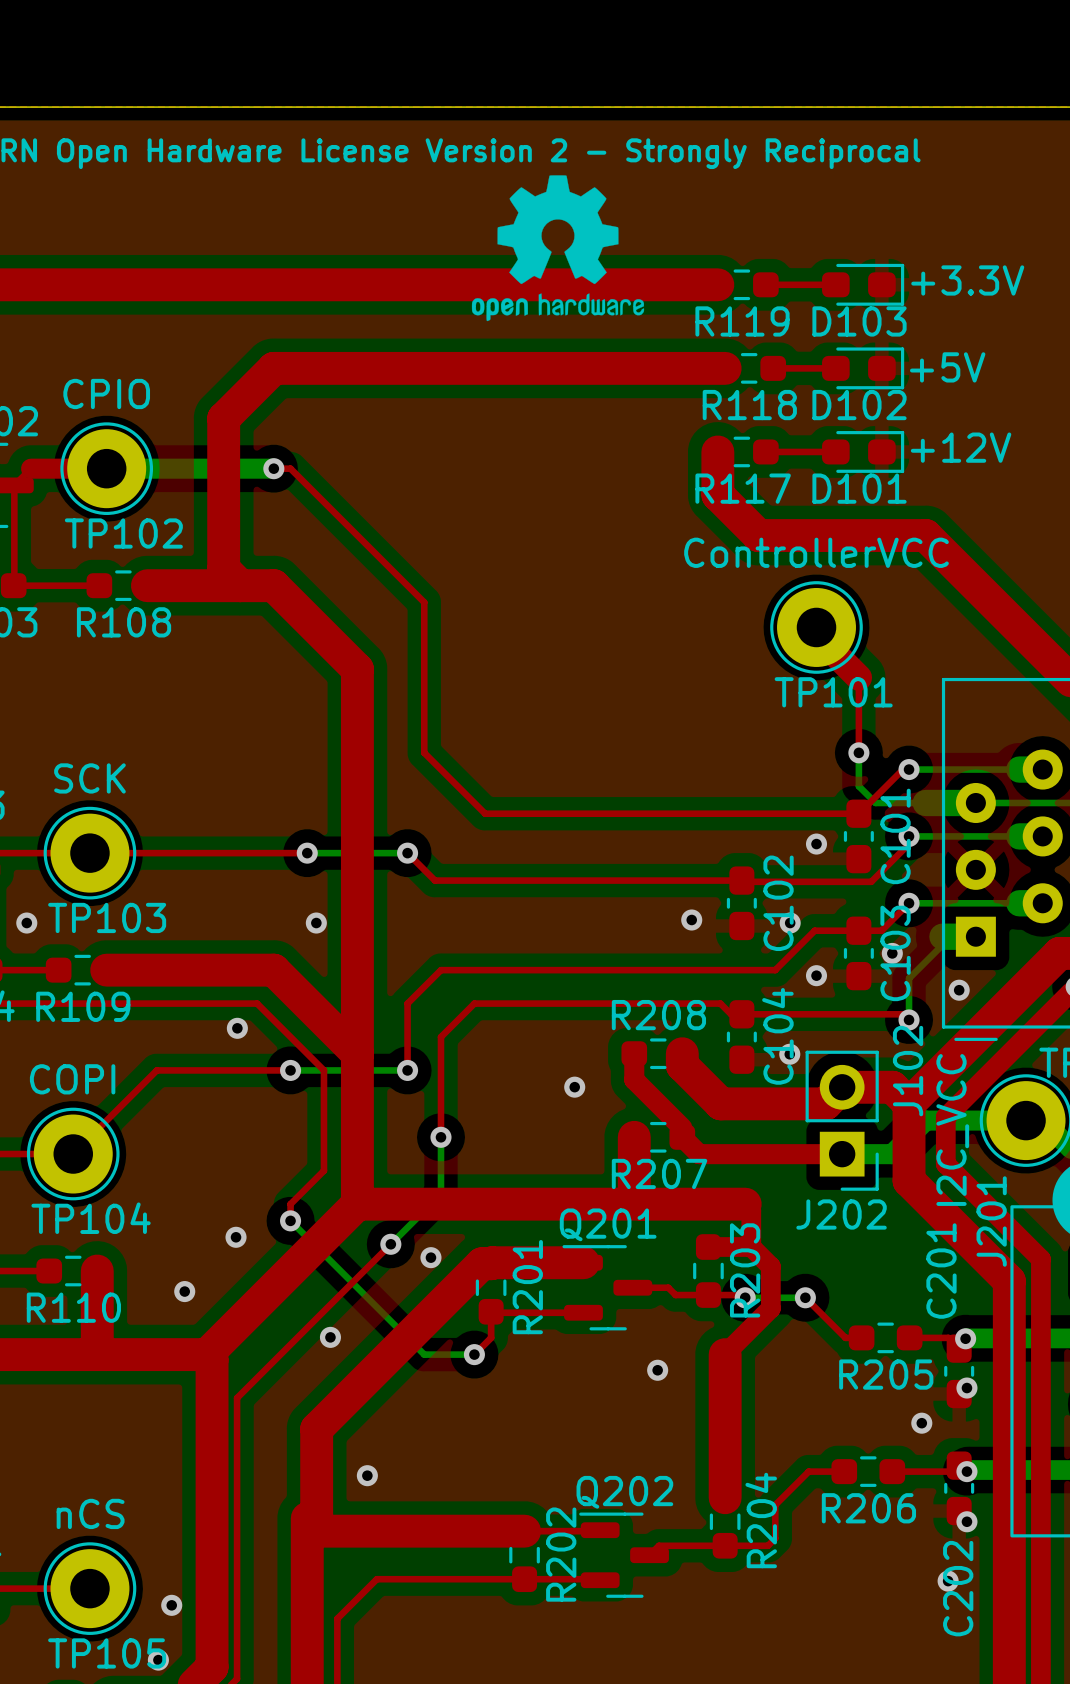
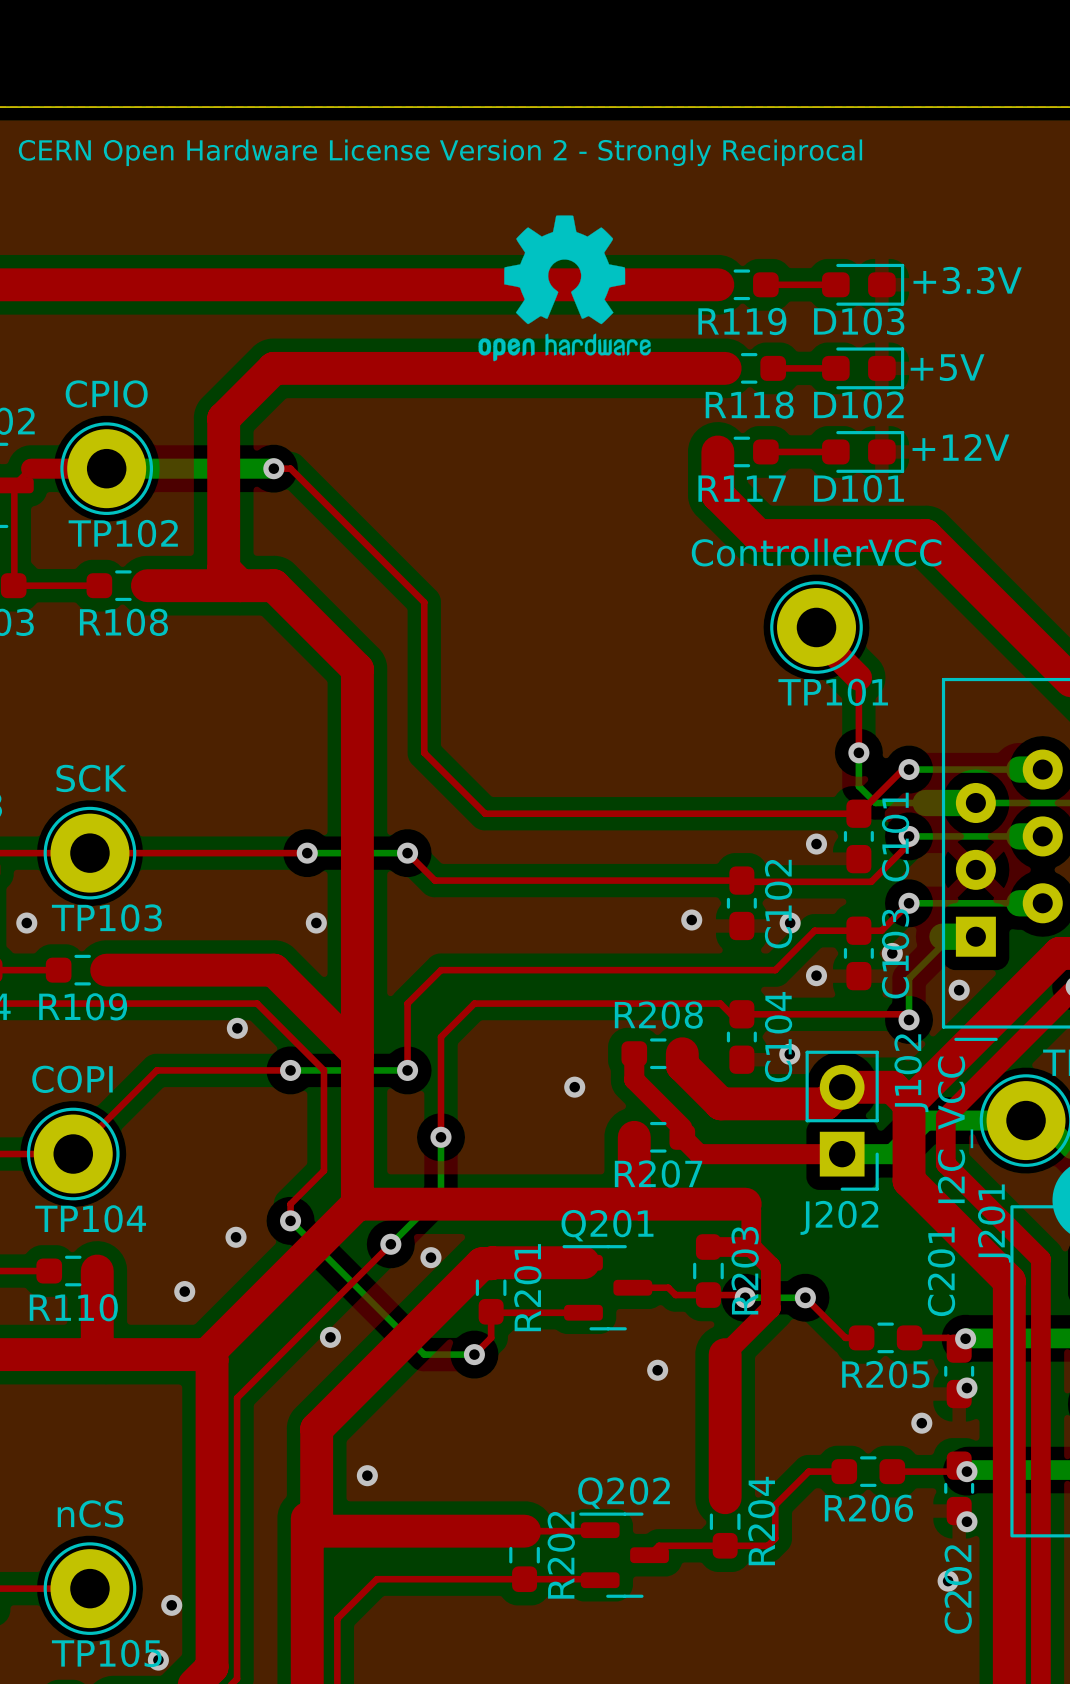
drawing position: (558, 248) -> (564, 288)

